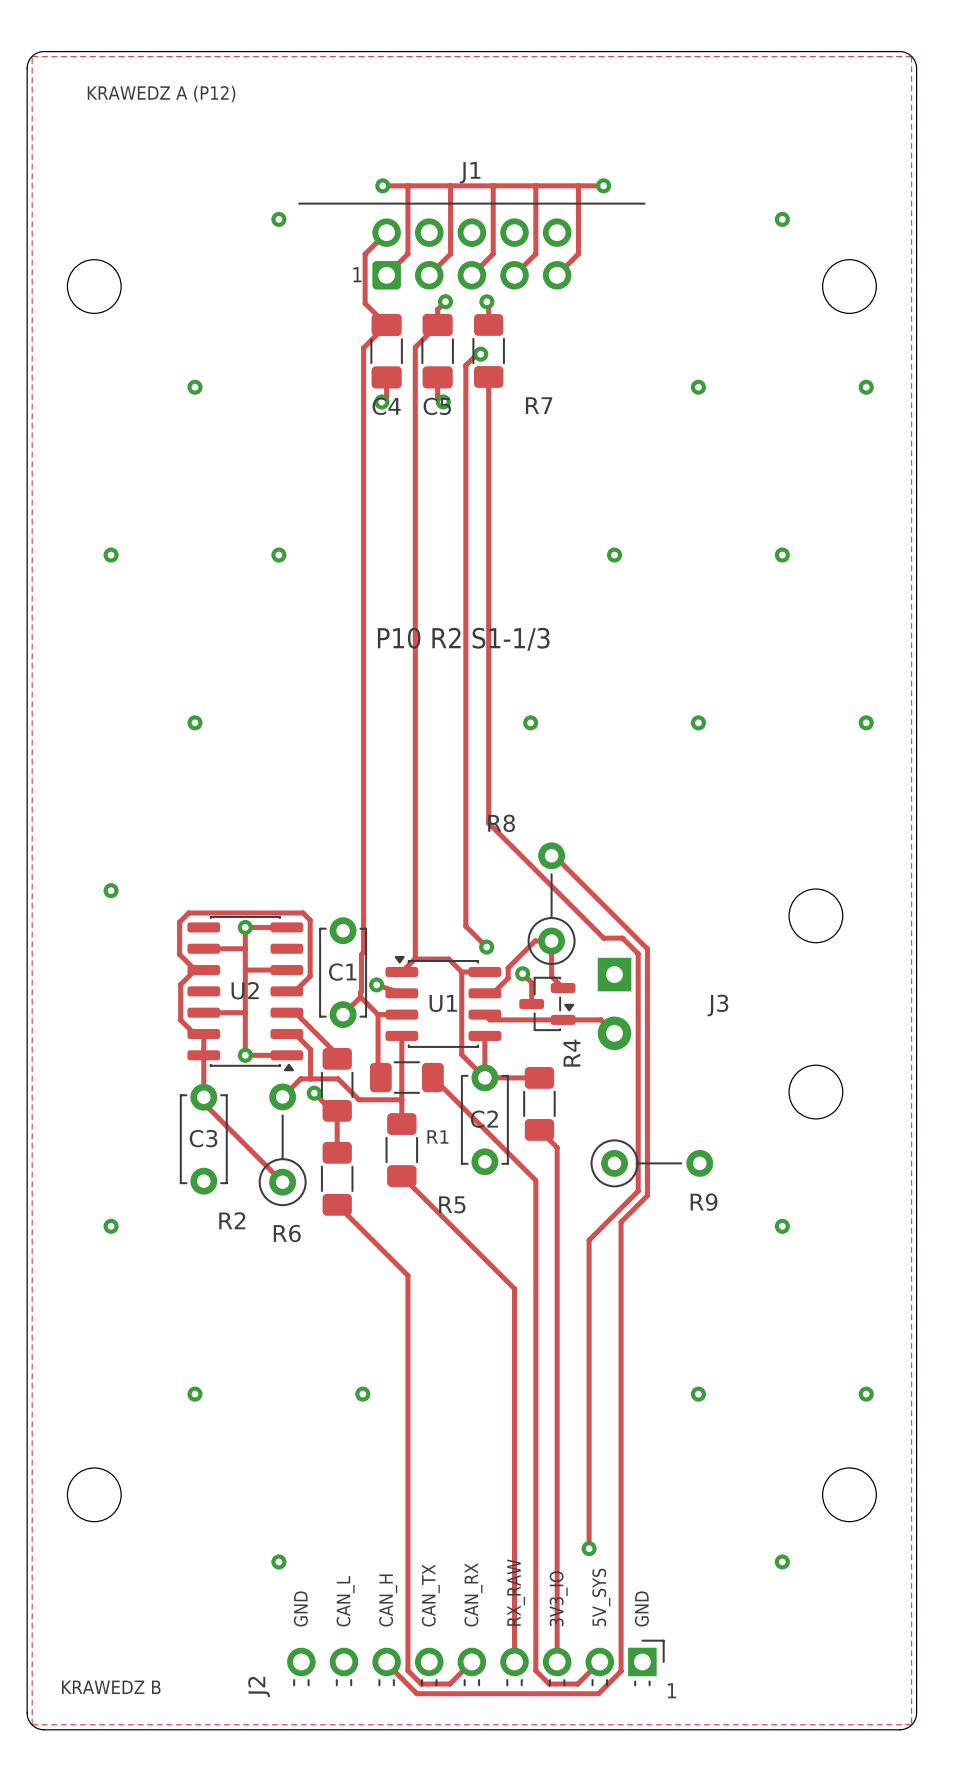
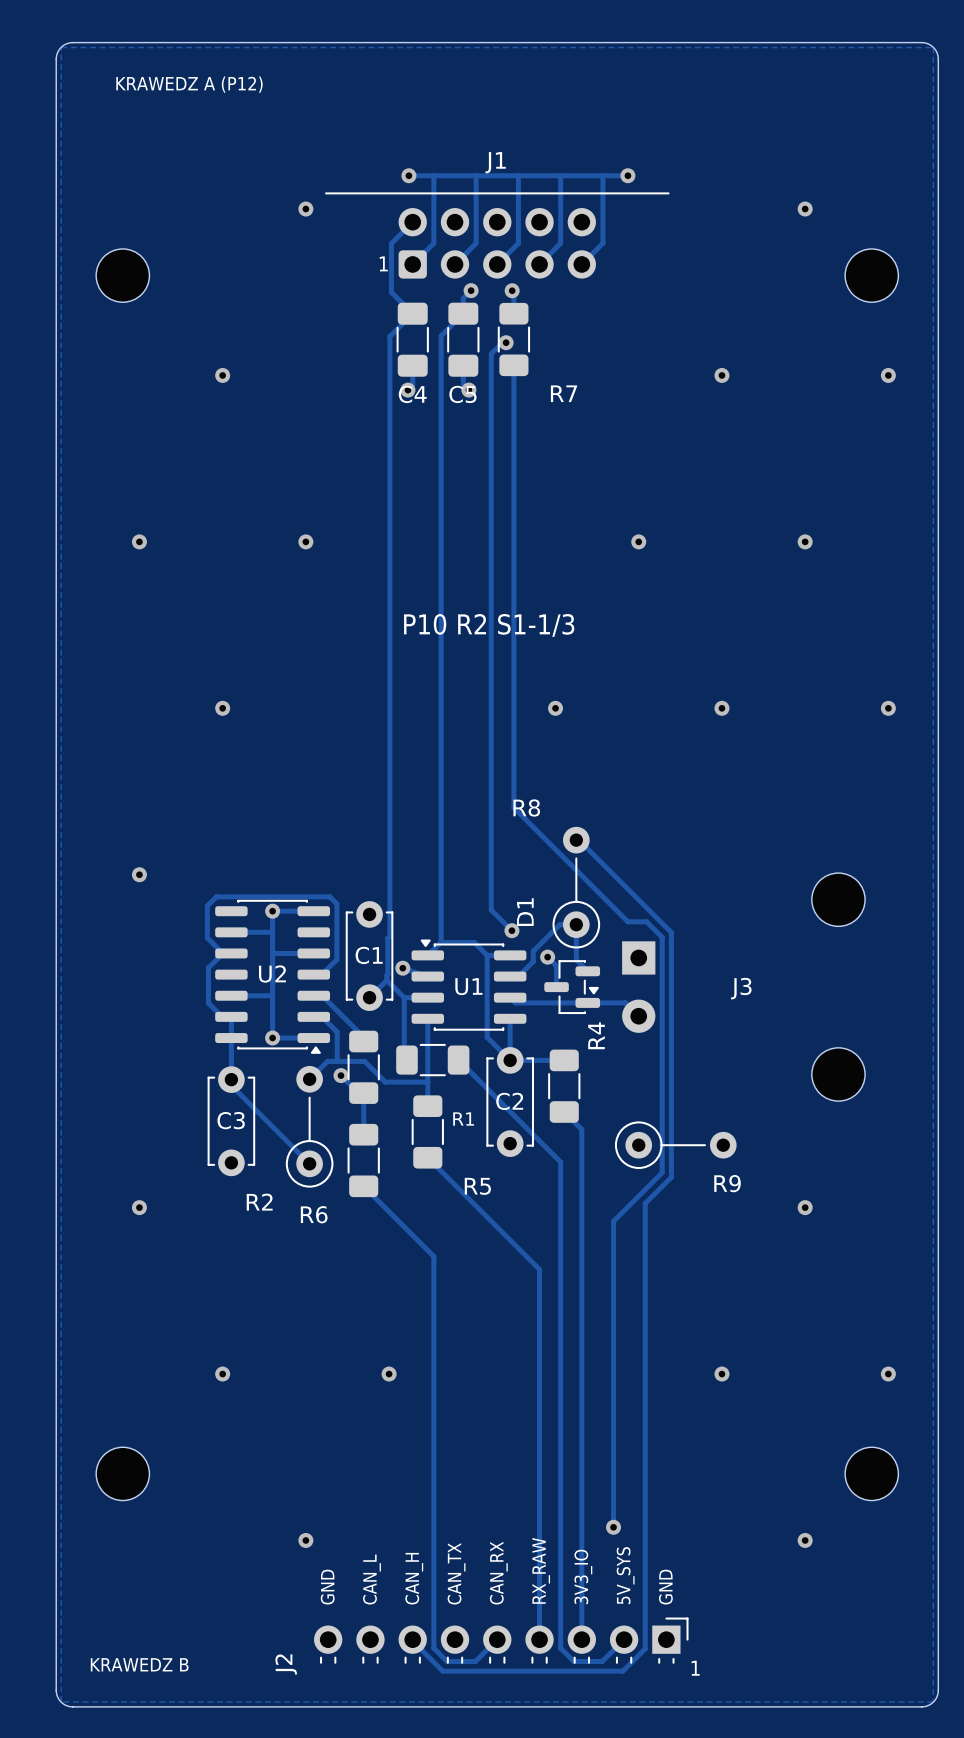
D1 name: none -> D1 (525, 912)

